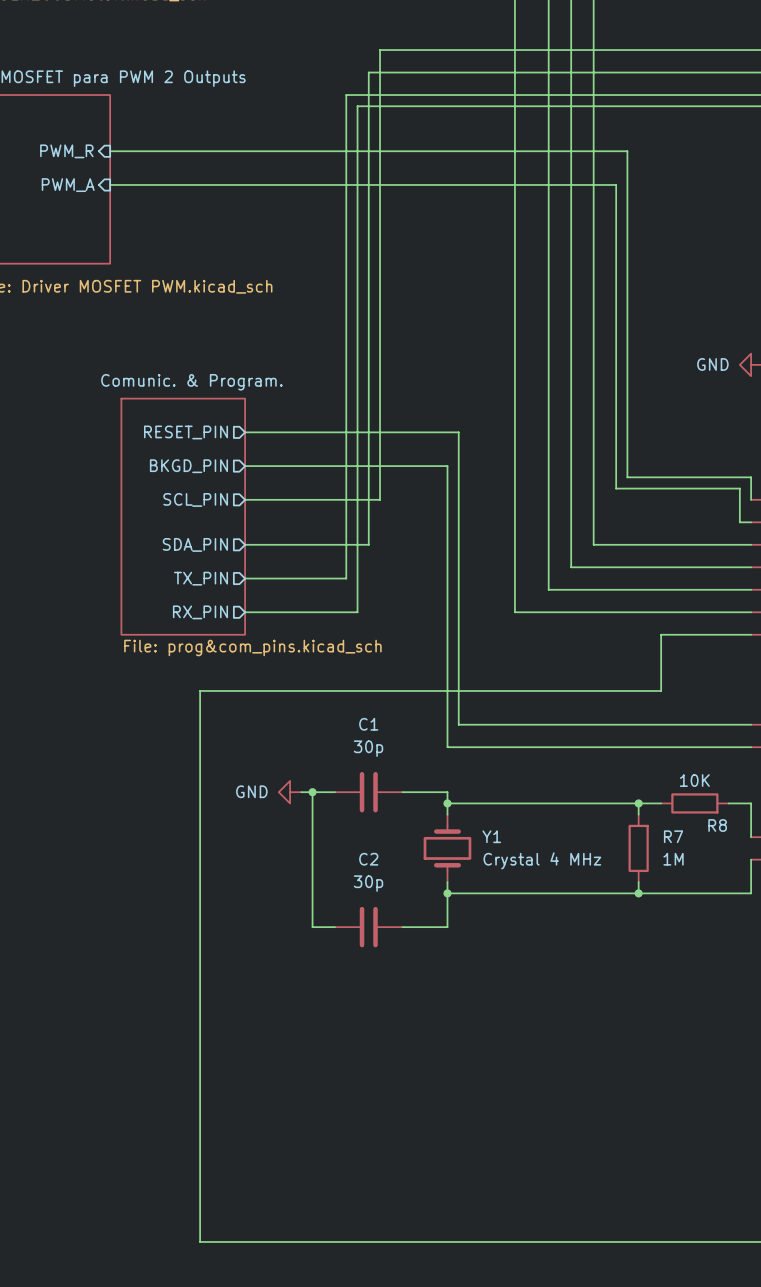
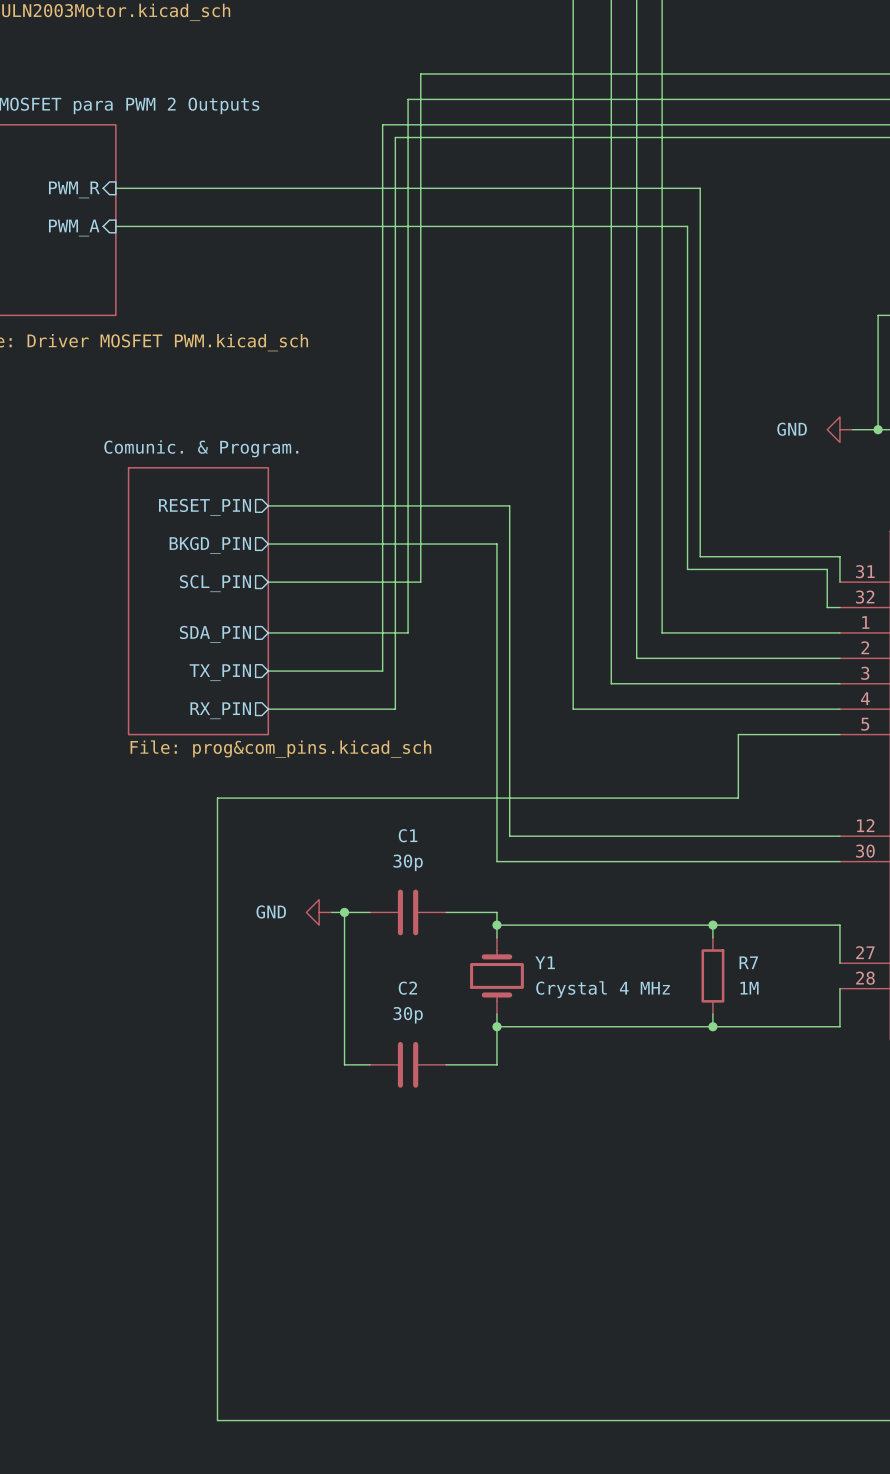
wire: none -> (738, 925) (814, 925)
R8: 10K (694, 803) -> none

